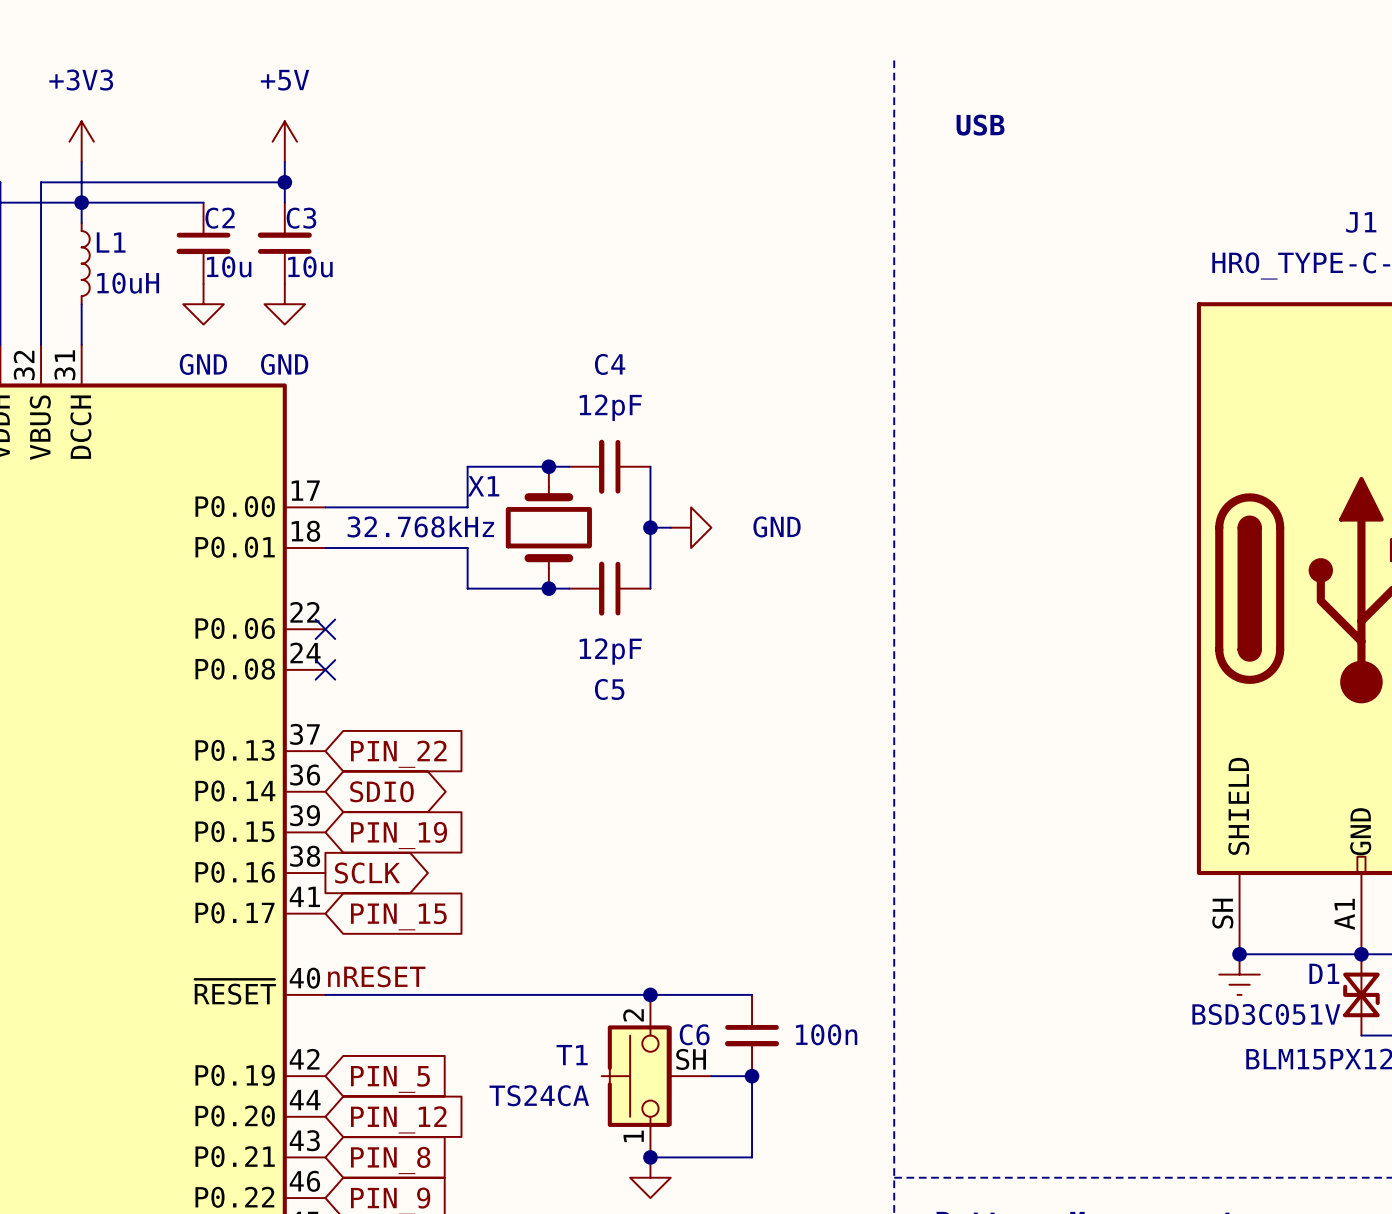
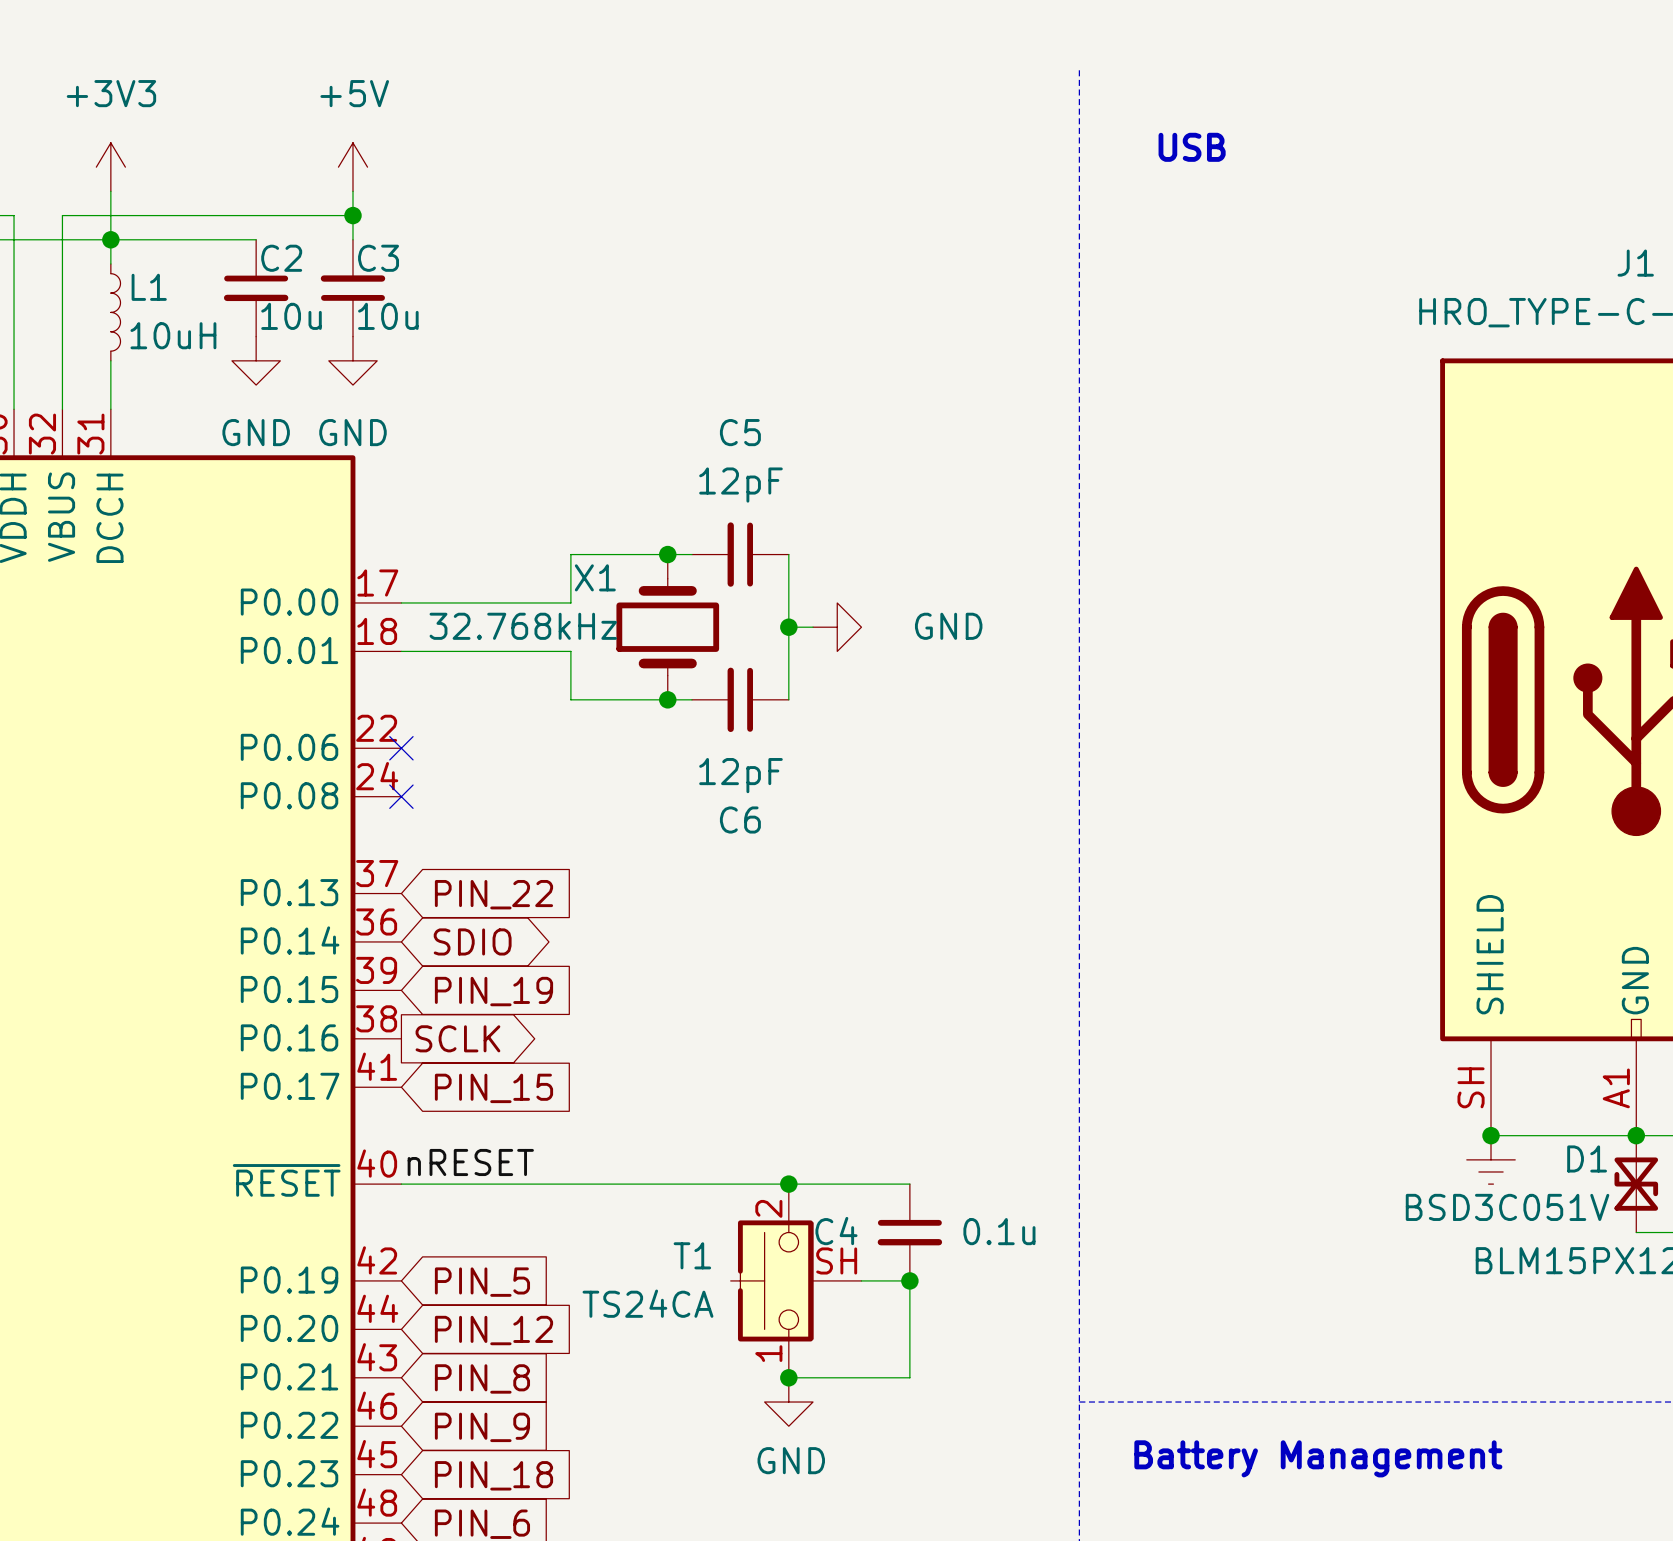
C4 name: C4 (610, 364) -> C5 (740, 432)
C5 name: C5 (609, 689) -> C6 (740, 819)
C6 name: C6 (694, 1034) -> C4 (836, 1231)
C6 value: 100n (826, 1034) -> 0.1u (999, 1231)

